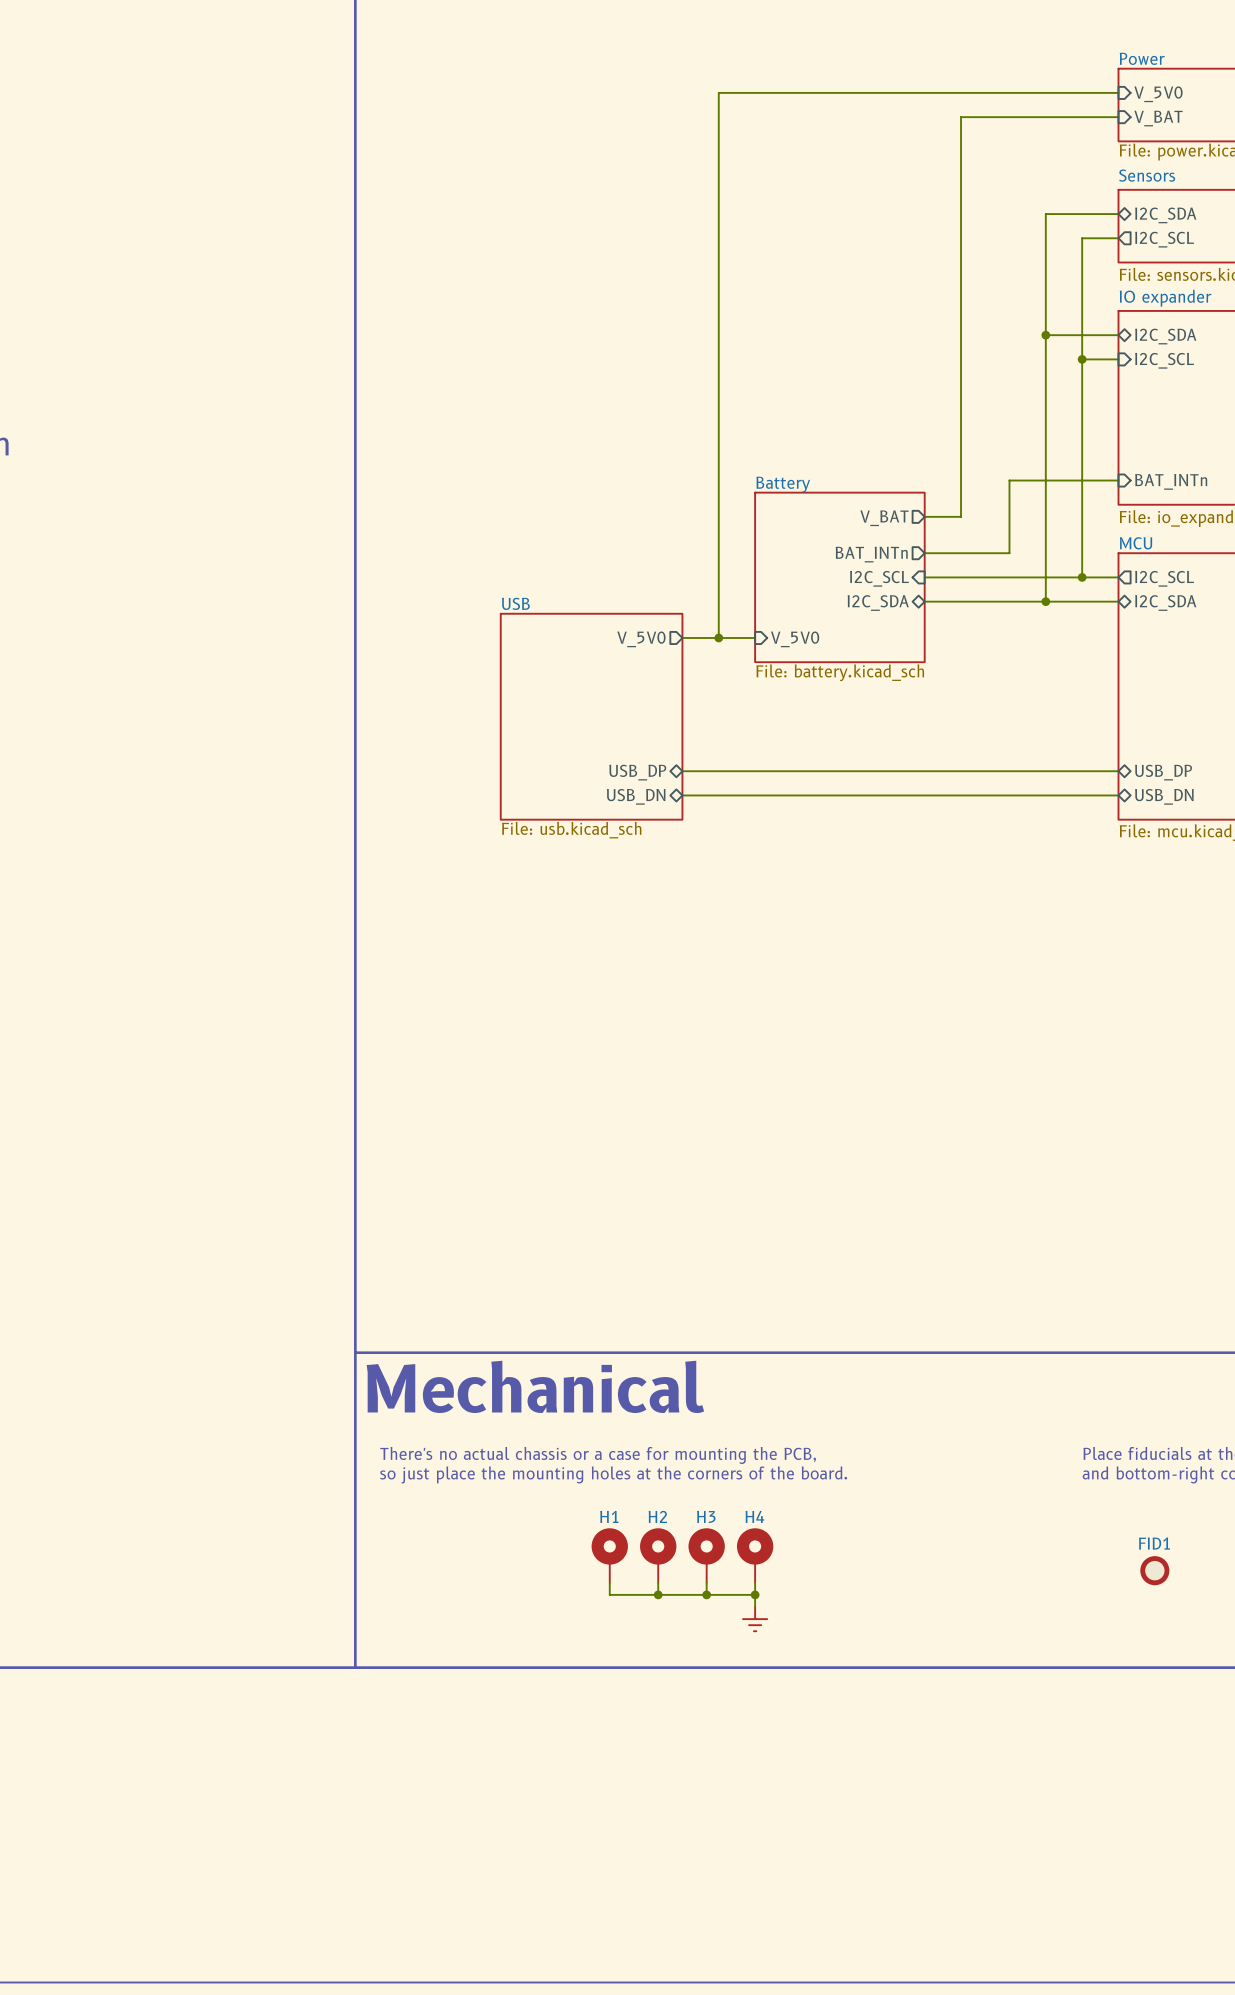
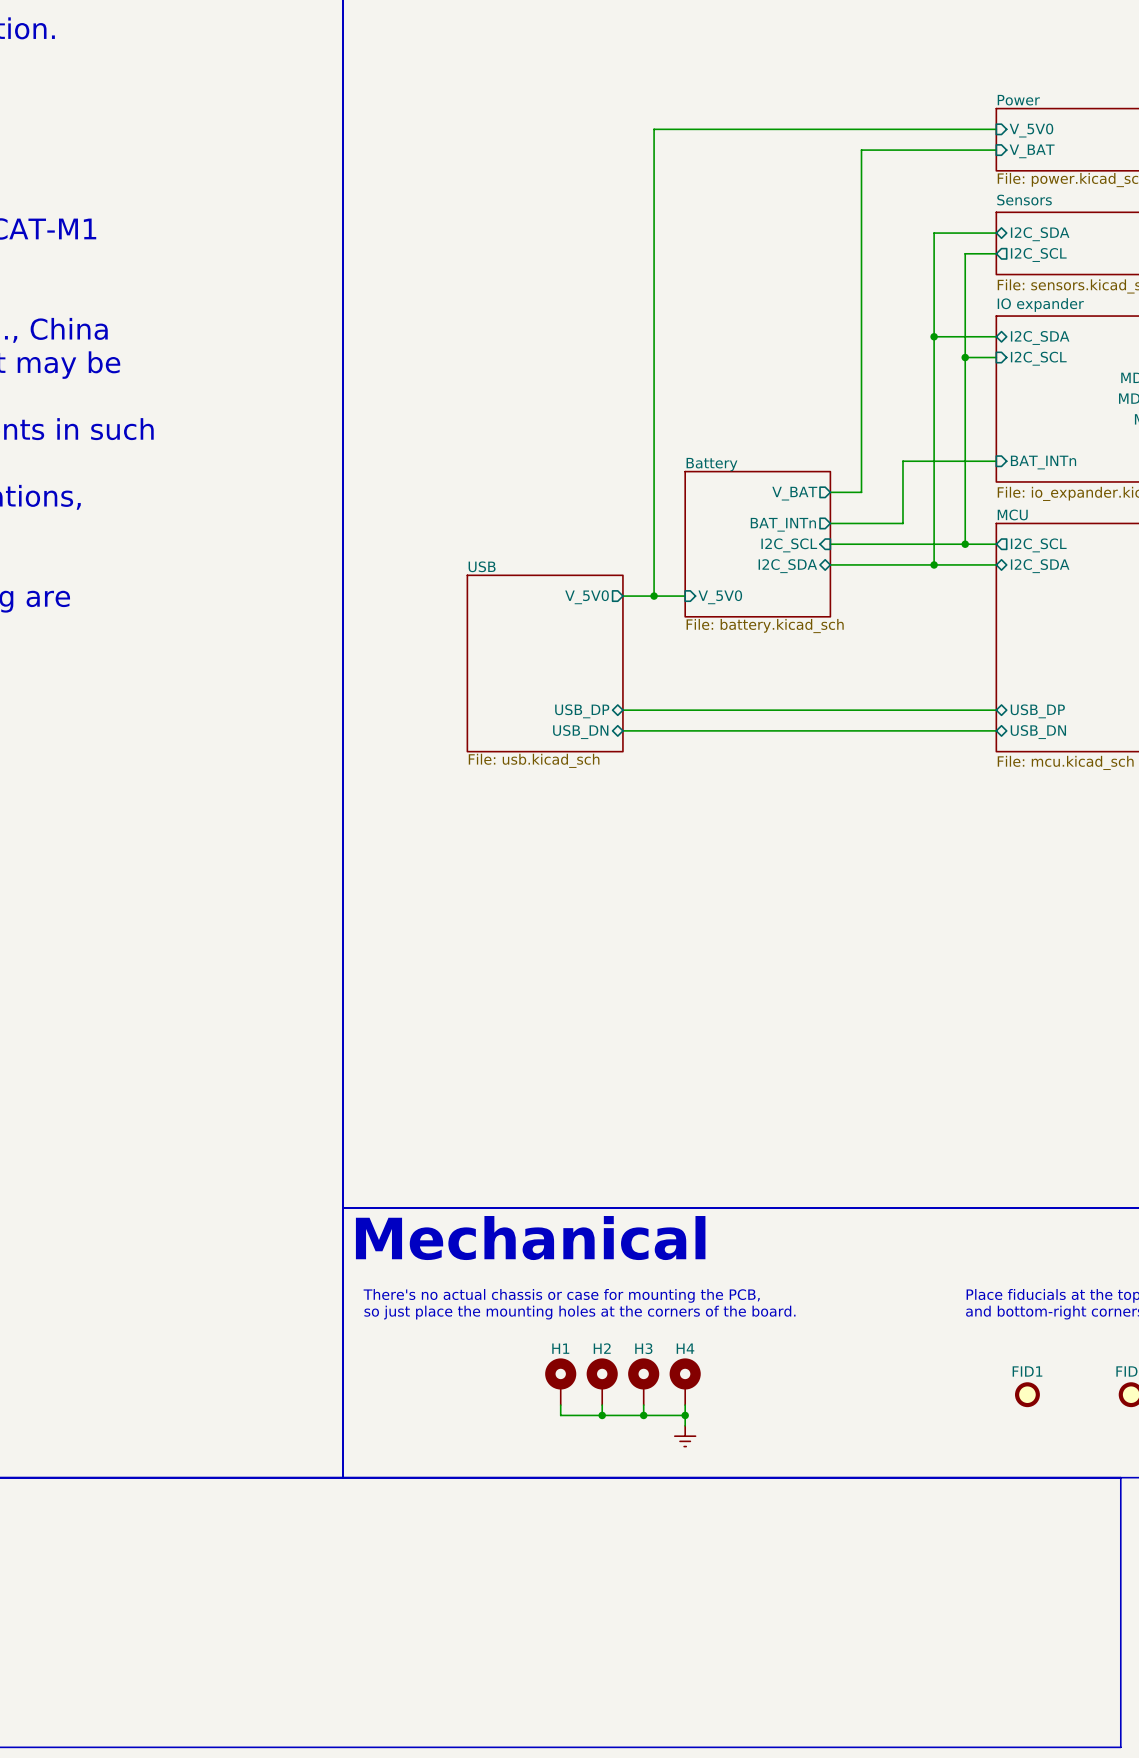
text: There's no actual chassis or a case for mounting the PCB, (598, 1455) -> There's no actual chassis or case for mounting the PCB, (561, 1295)

